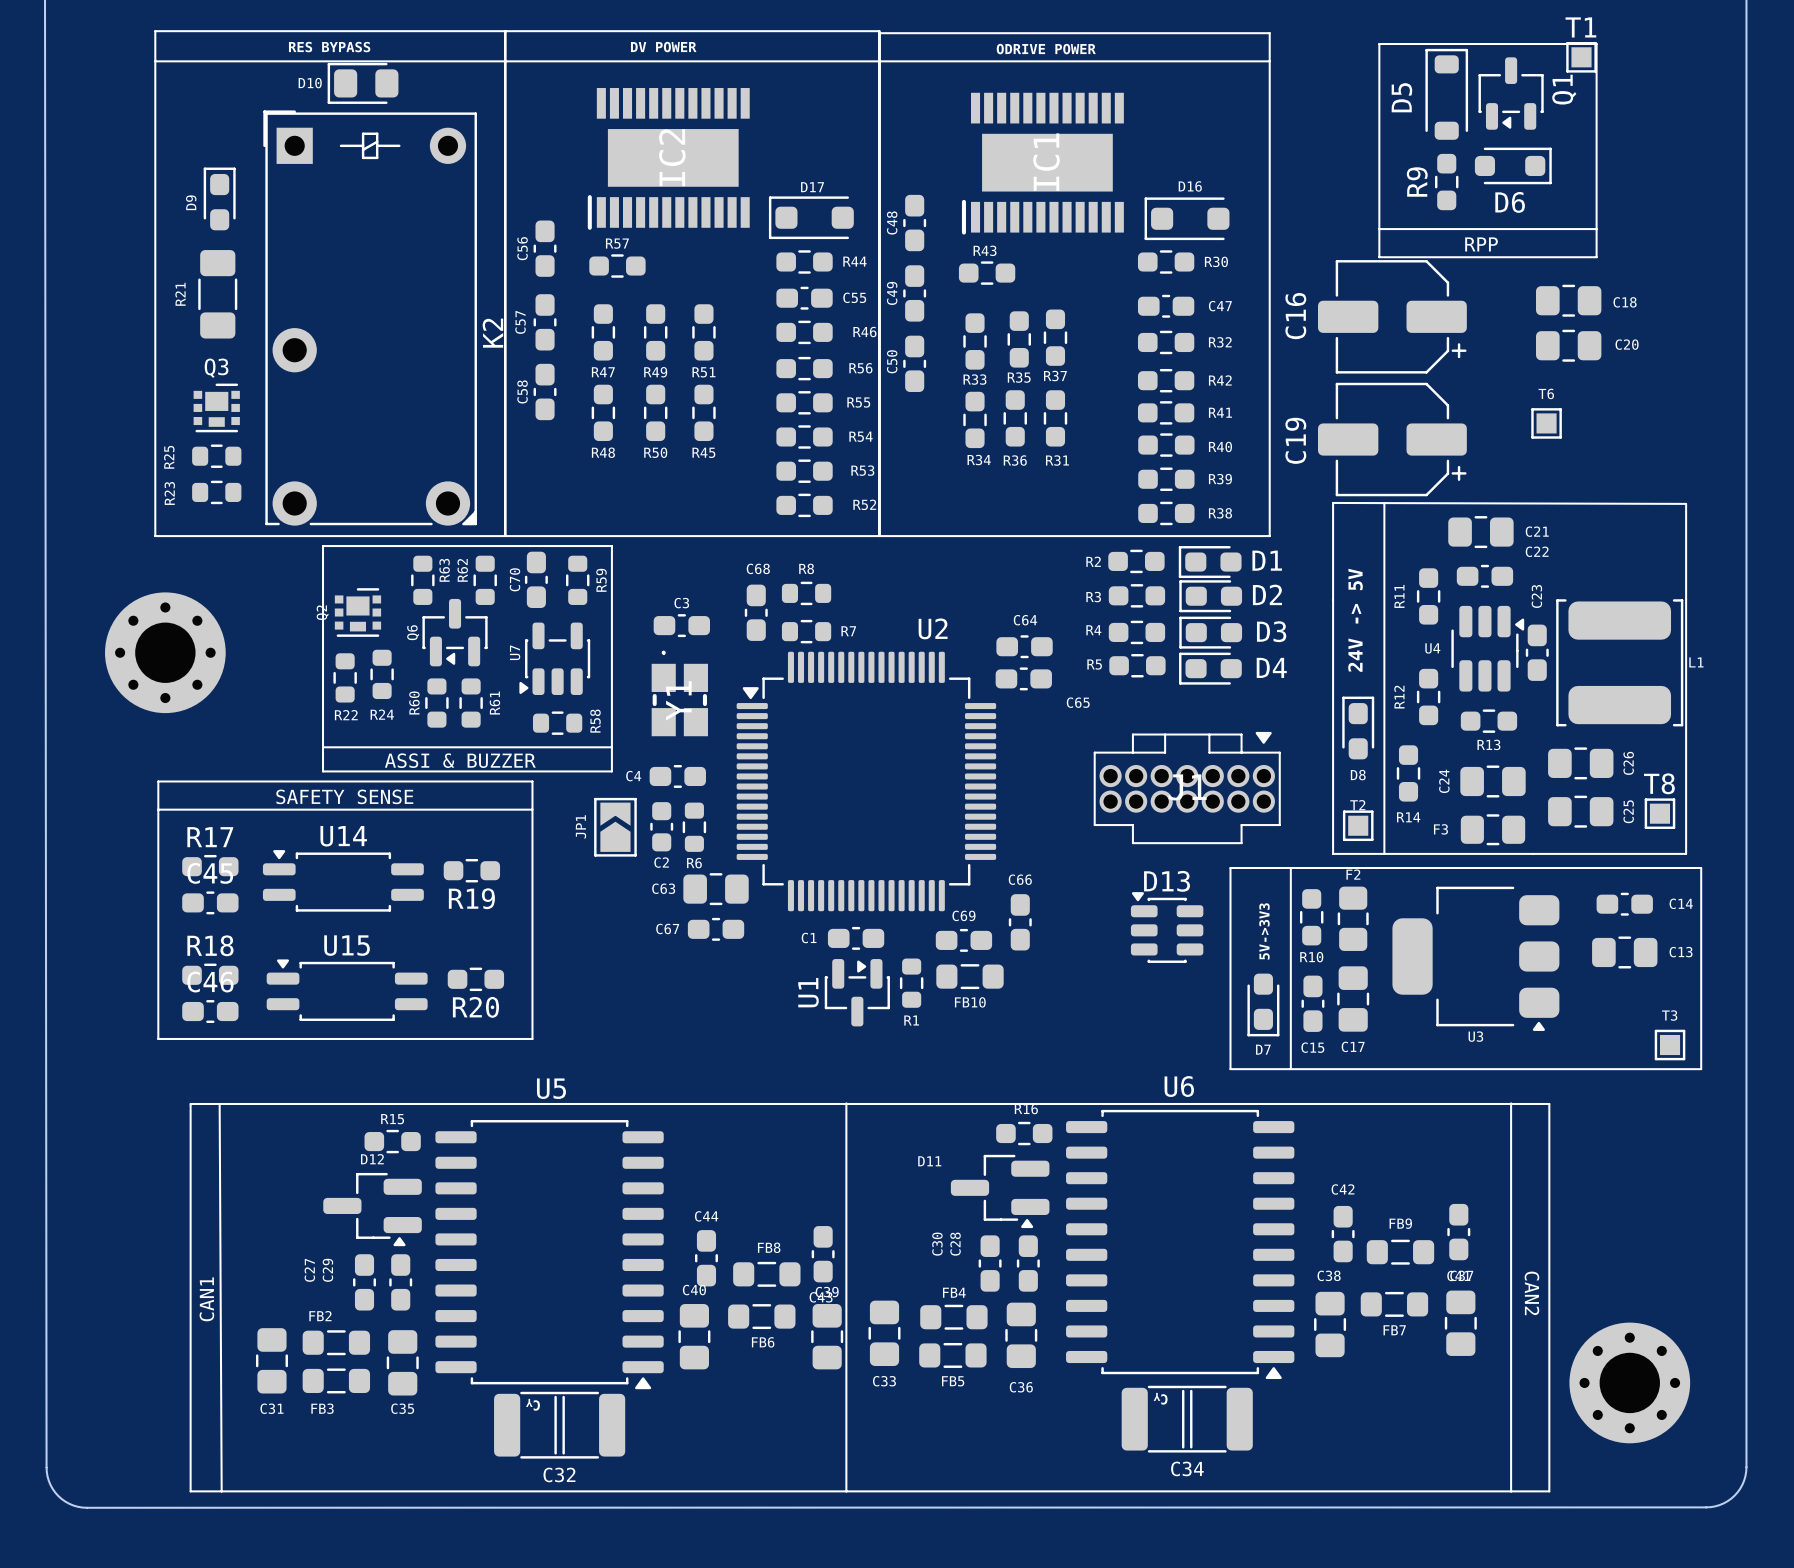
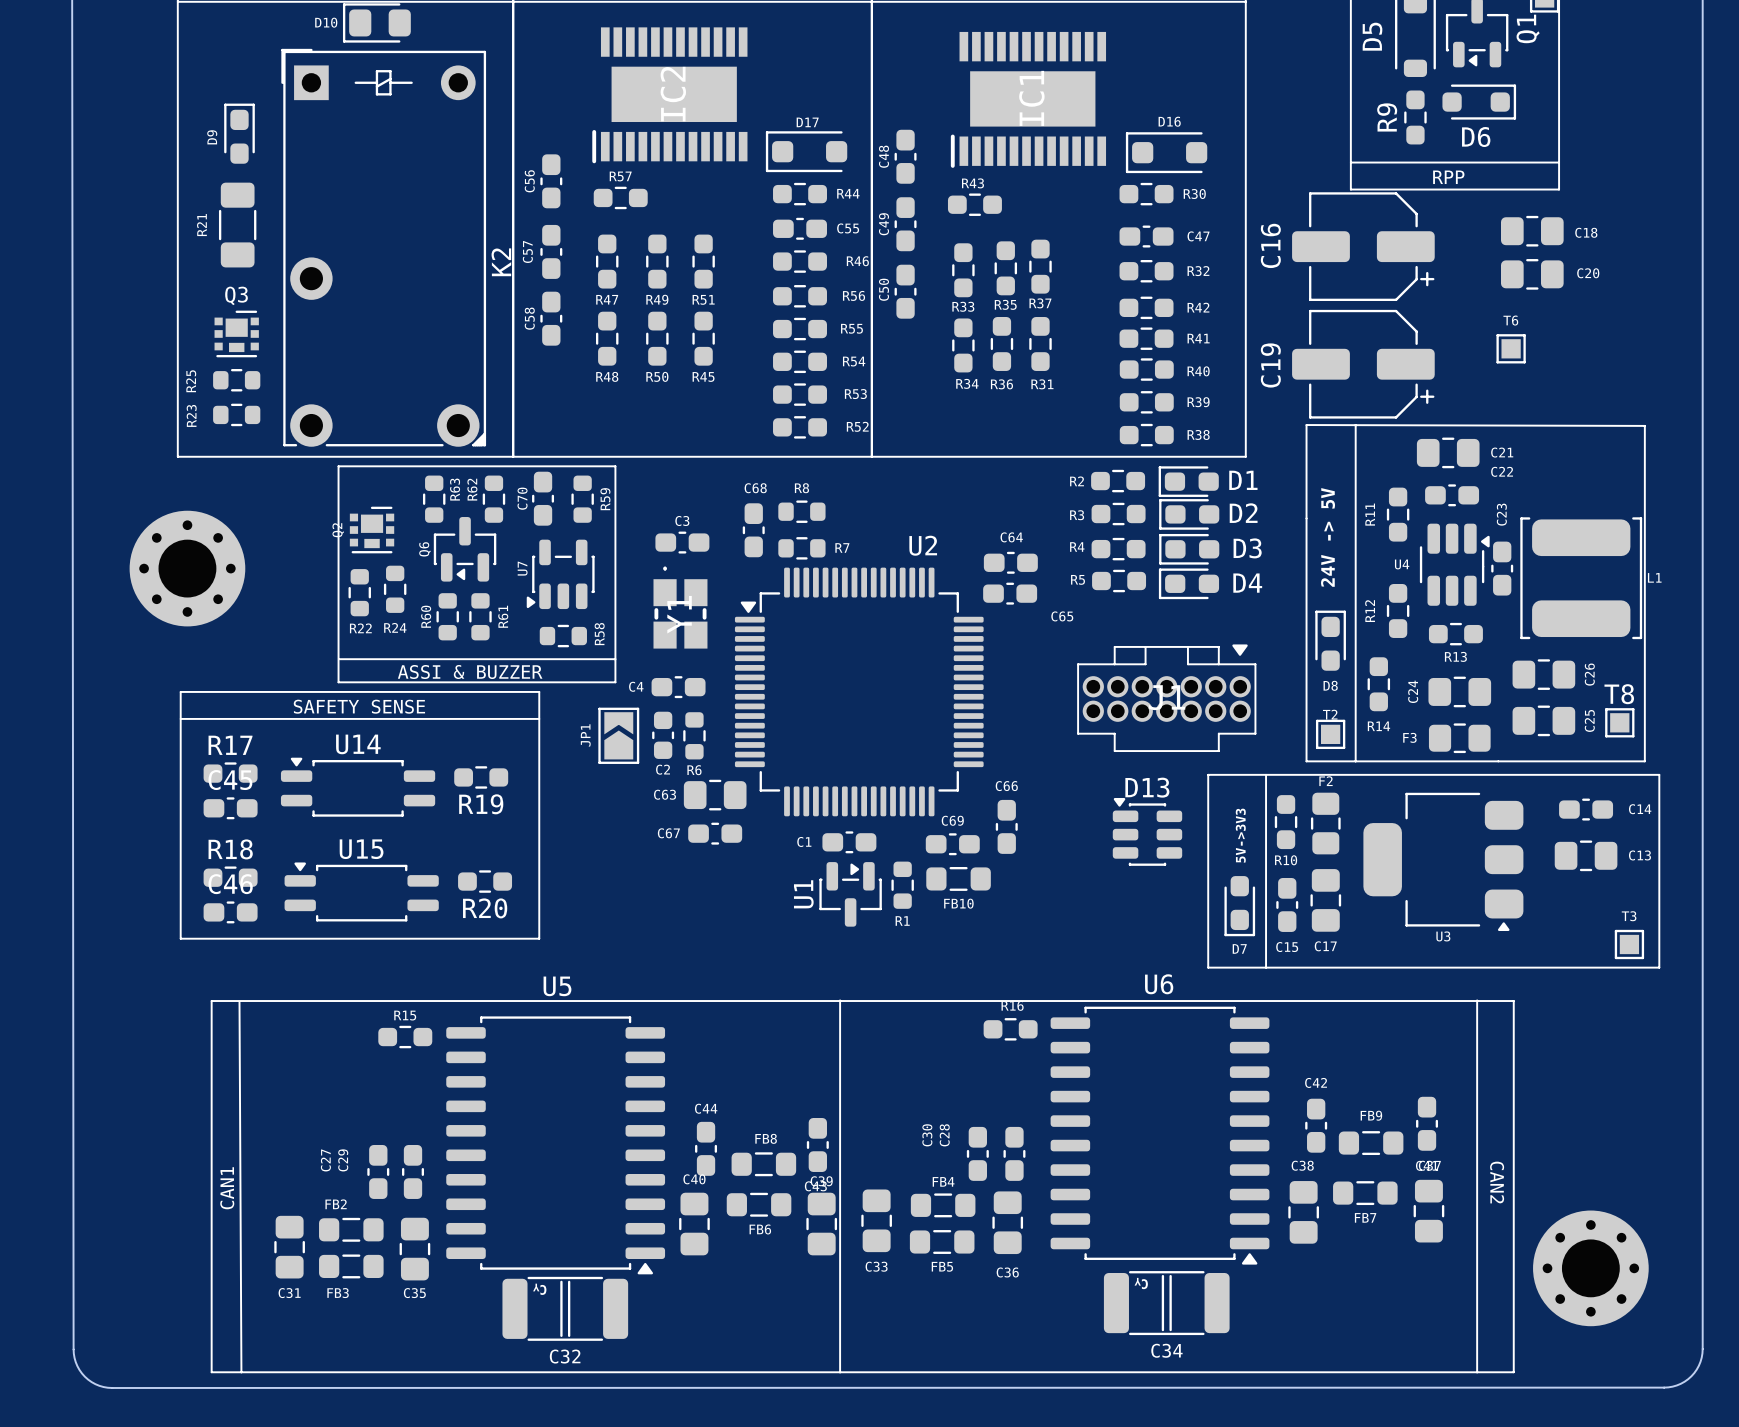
D11: (1000, 1191) -> none
D12: (372, 1209) -> none

